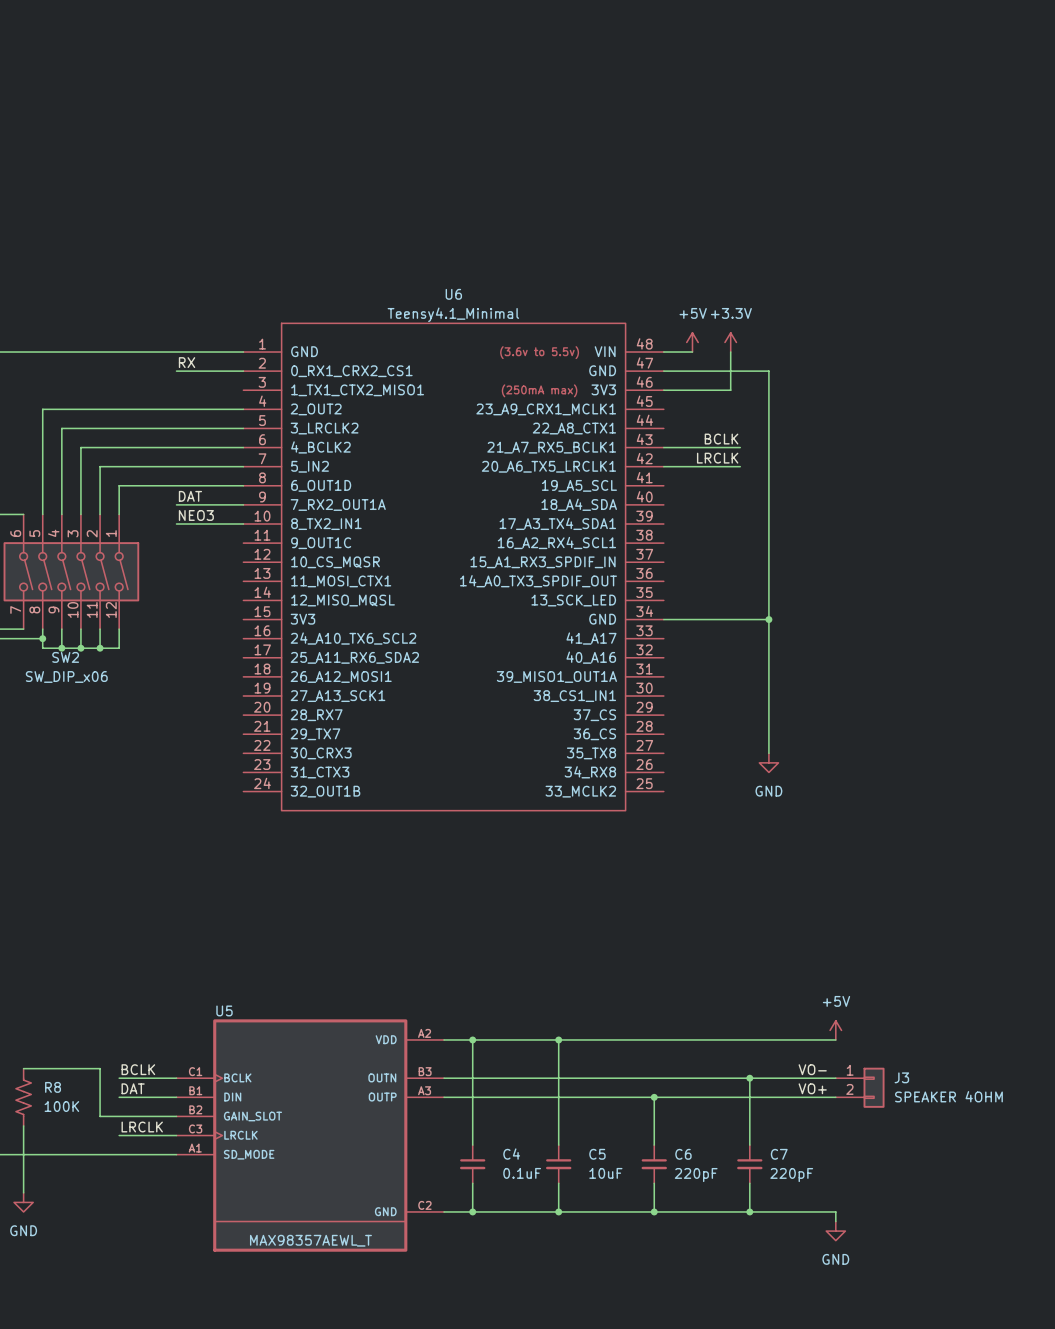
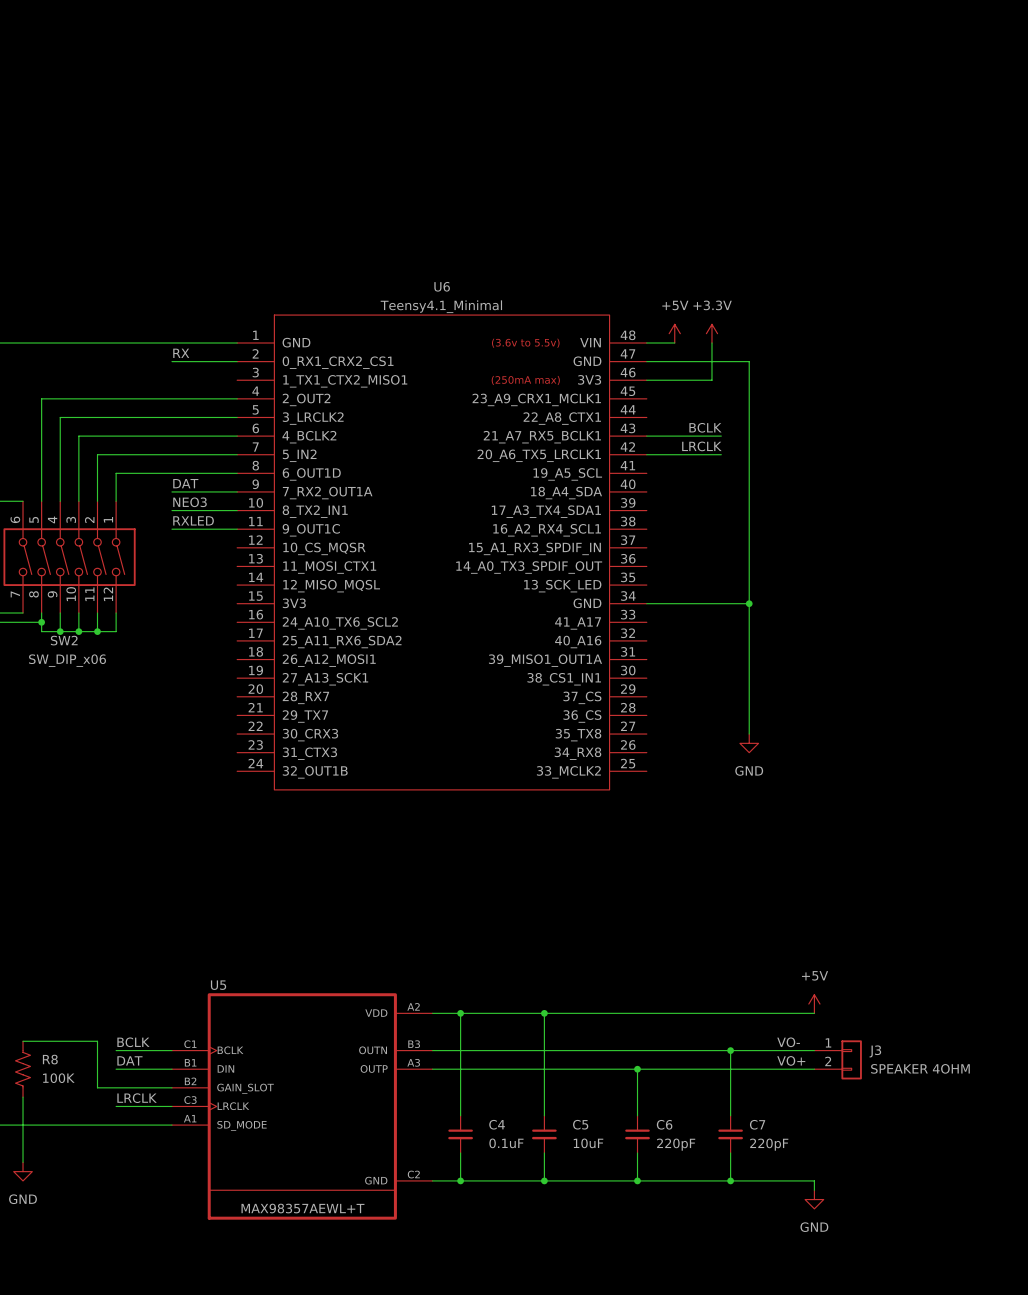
label: none -> RXLED (193, 520)
wire: none -> (171, 529) (237, 529)
U5 value: MAX98357AEWL_T (310, 1240) -> MAX98357AEWL+T (302, 1208)

